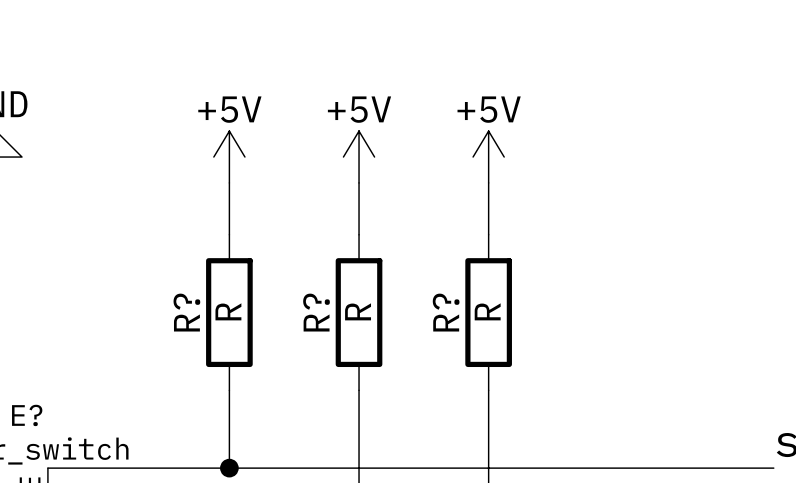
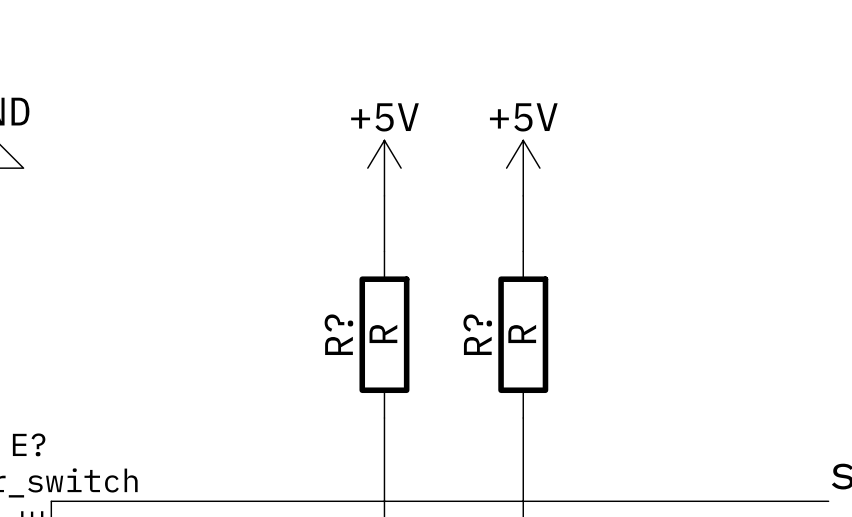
power symbol: +5V (229, 157) -> none
wire: (229, 182) (229, 234) -> none
R?: R (229, 312) -> none
wire: (229, 390) (229, 468) -> none
junction: (229, 468) -> none

